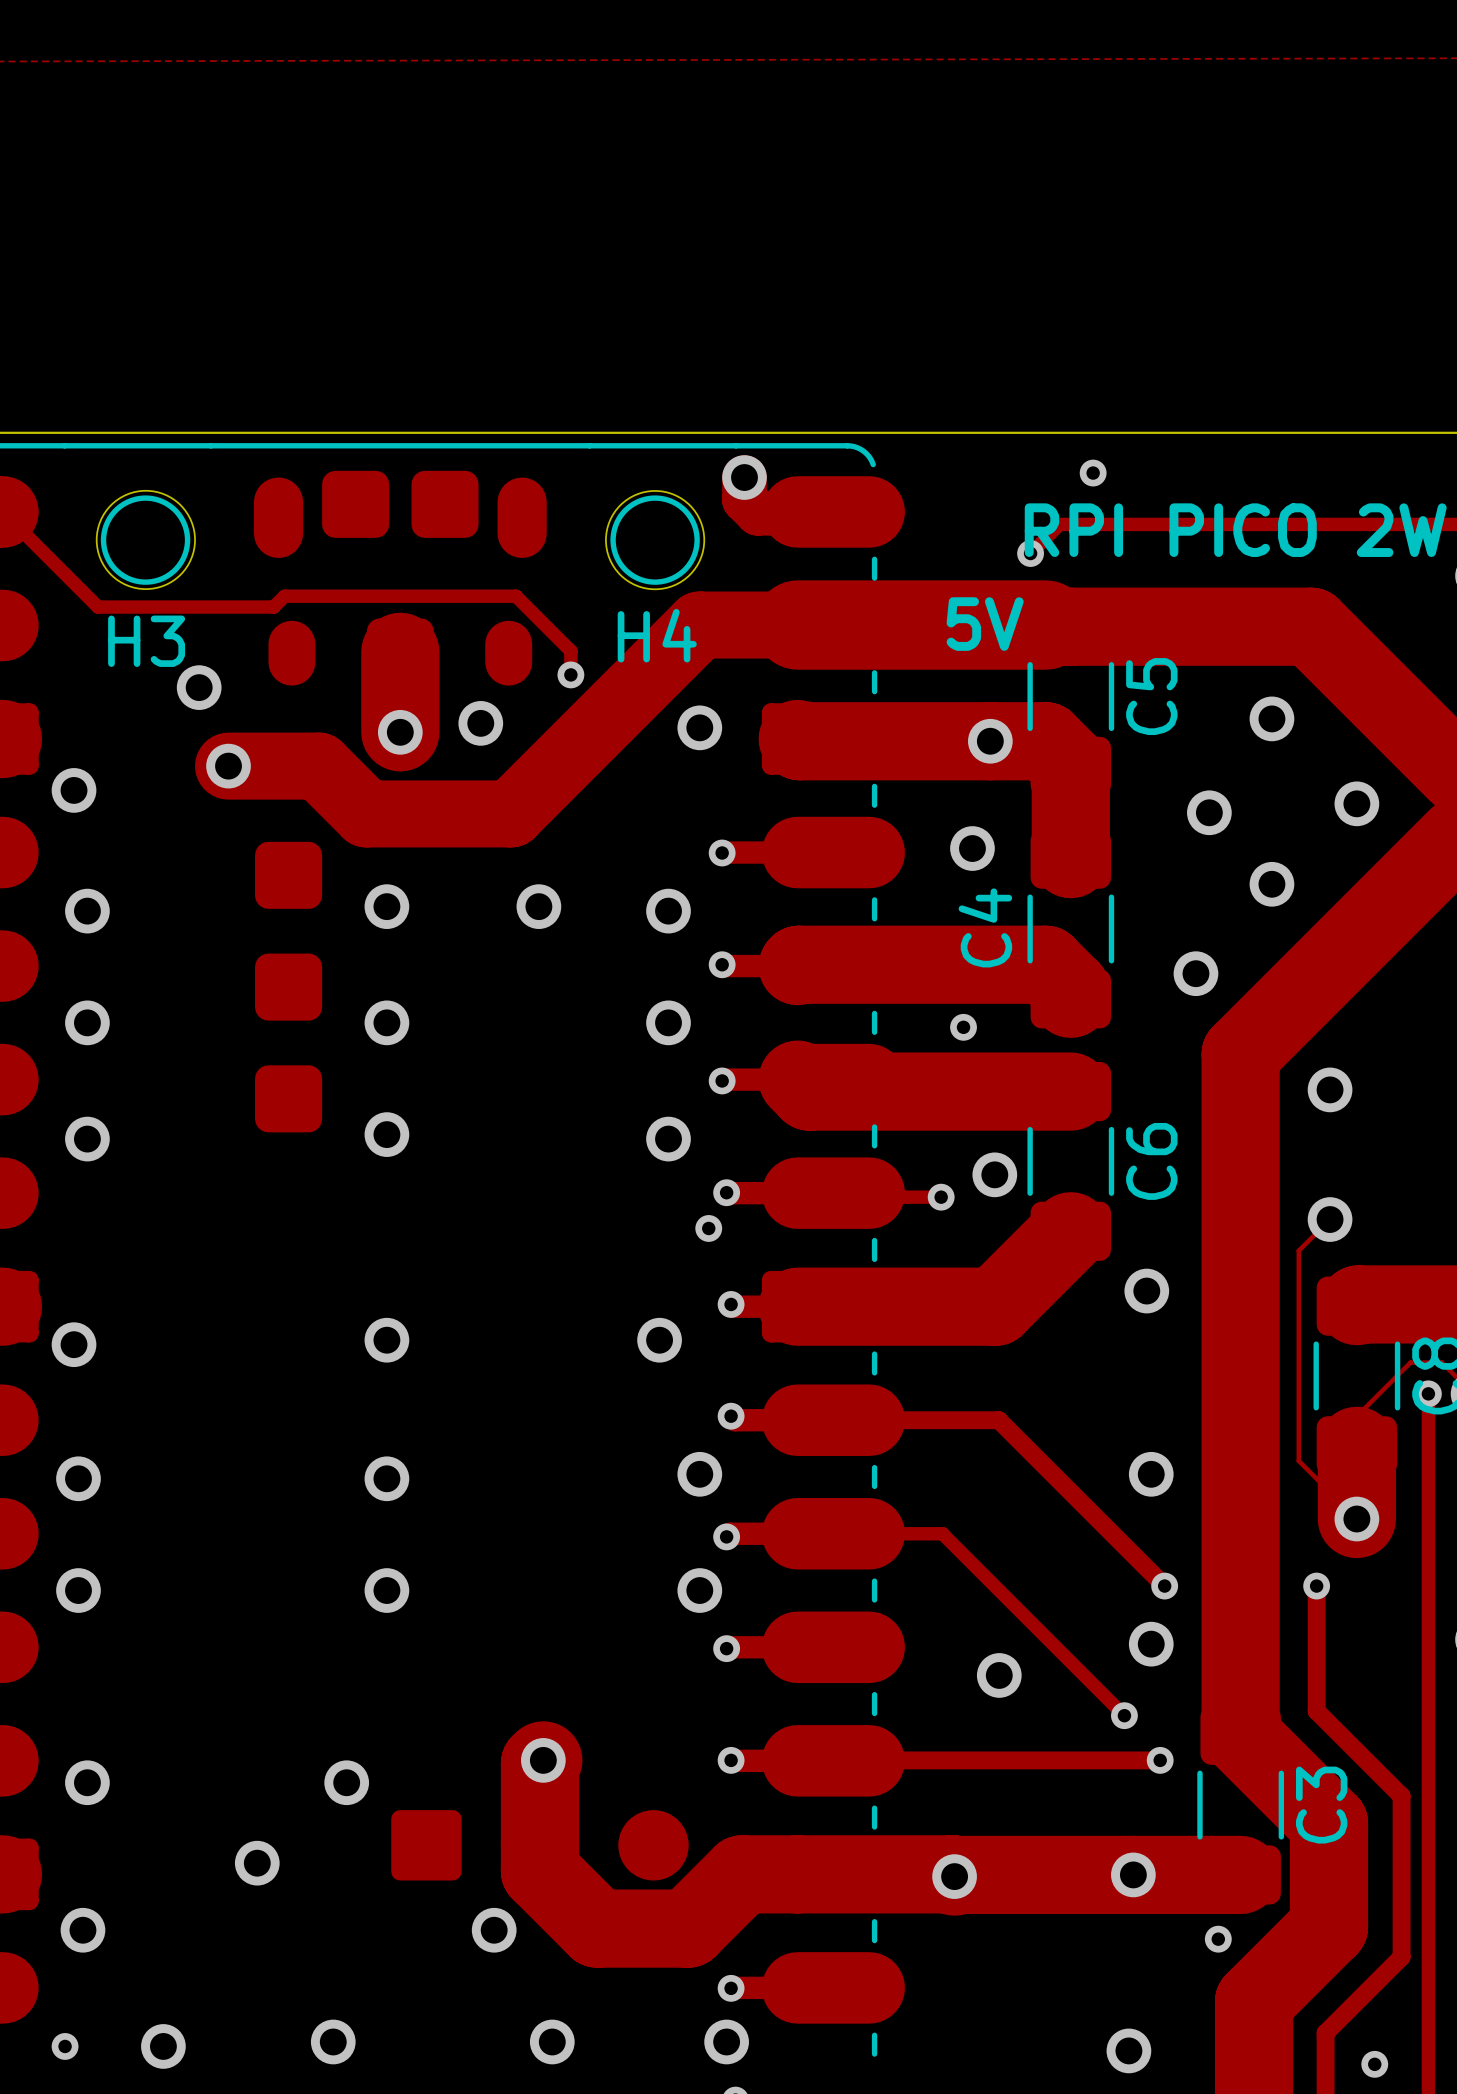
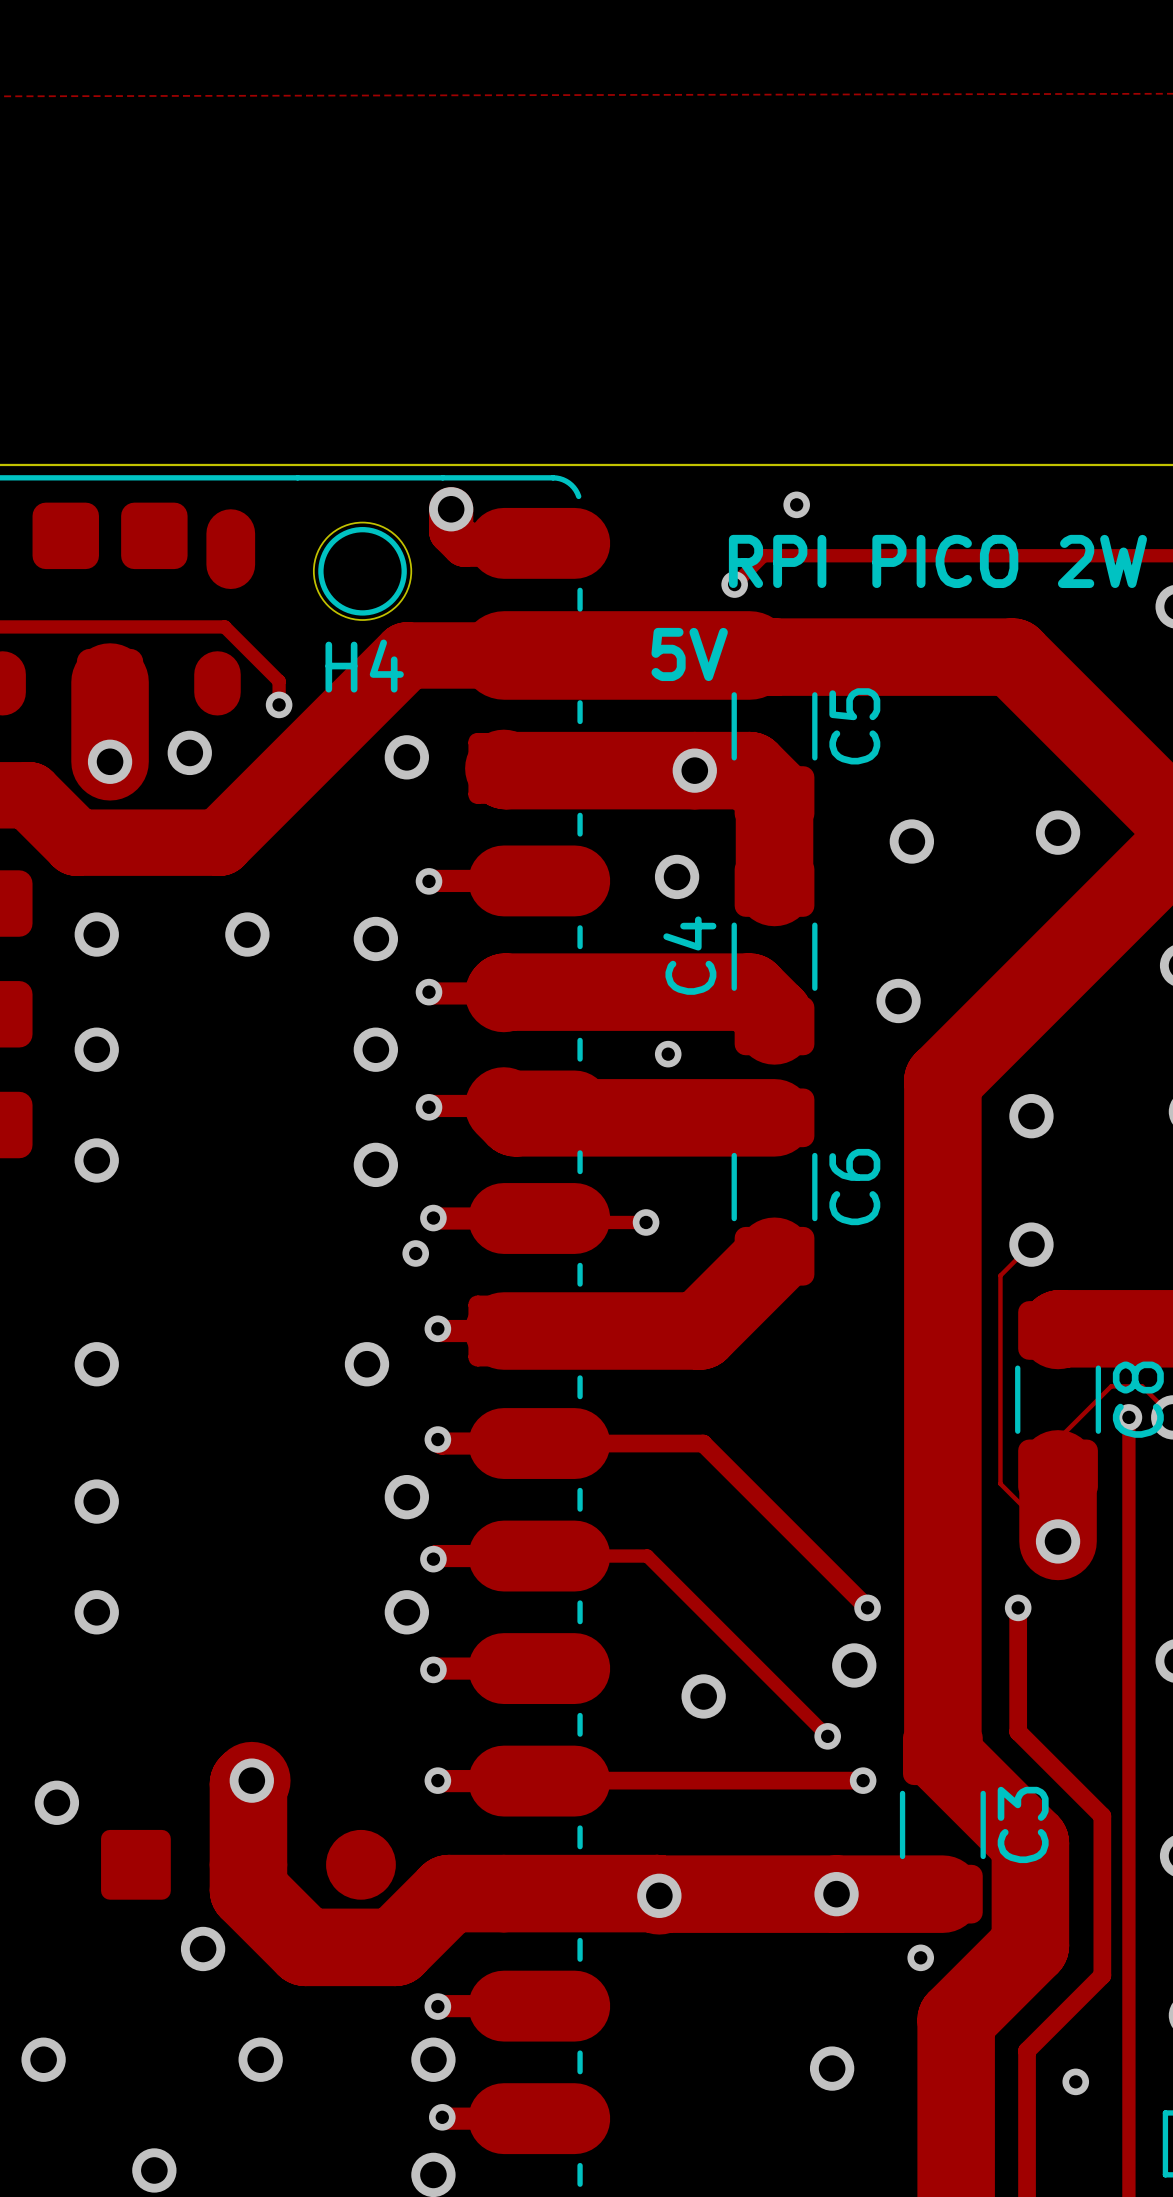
via: (1271, 718) -> none
via: (1271, 884) -> none
via: (994, 1174) -> none
via: (1146, 1291) -> none
via: (1151, 1474) -> none

